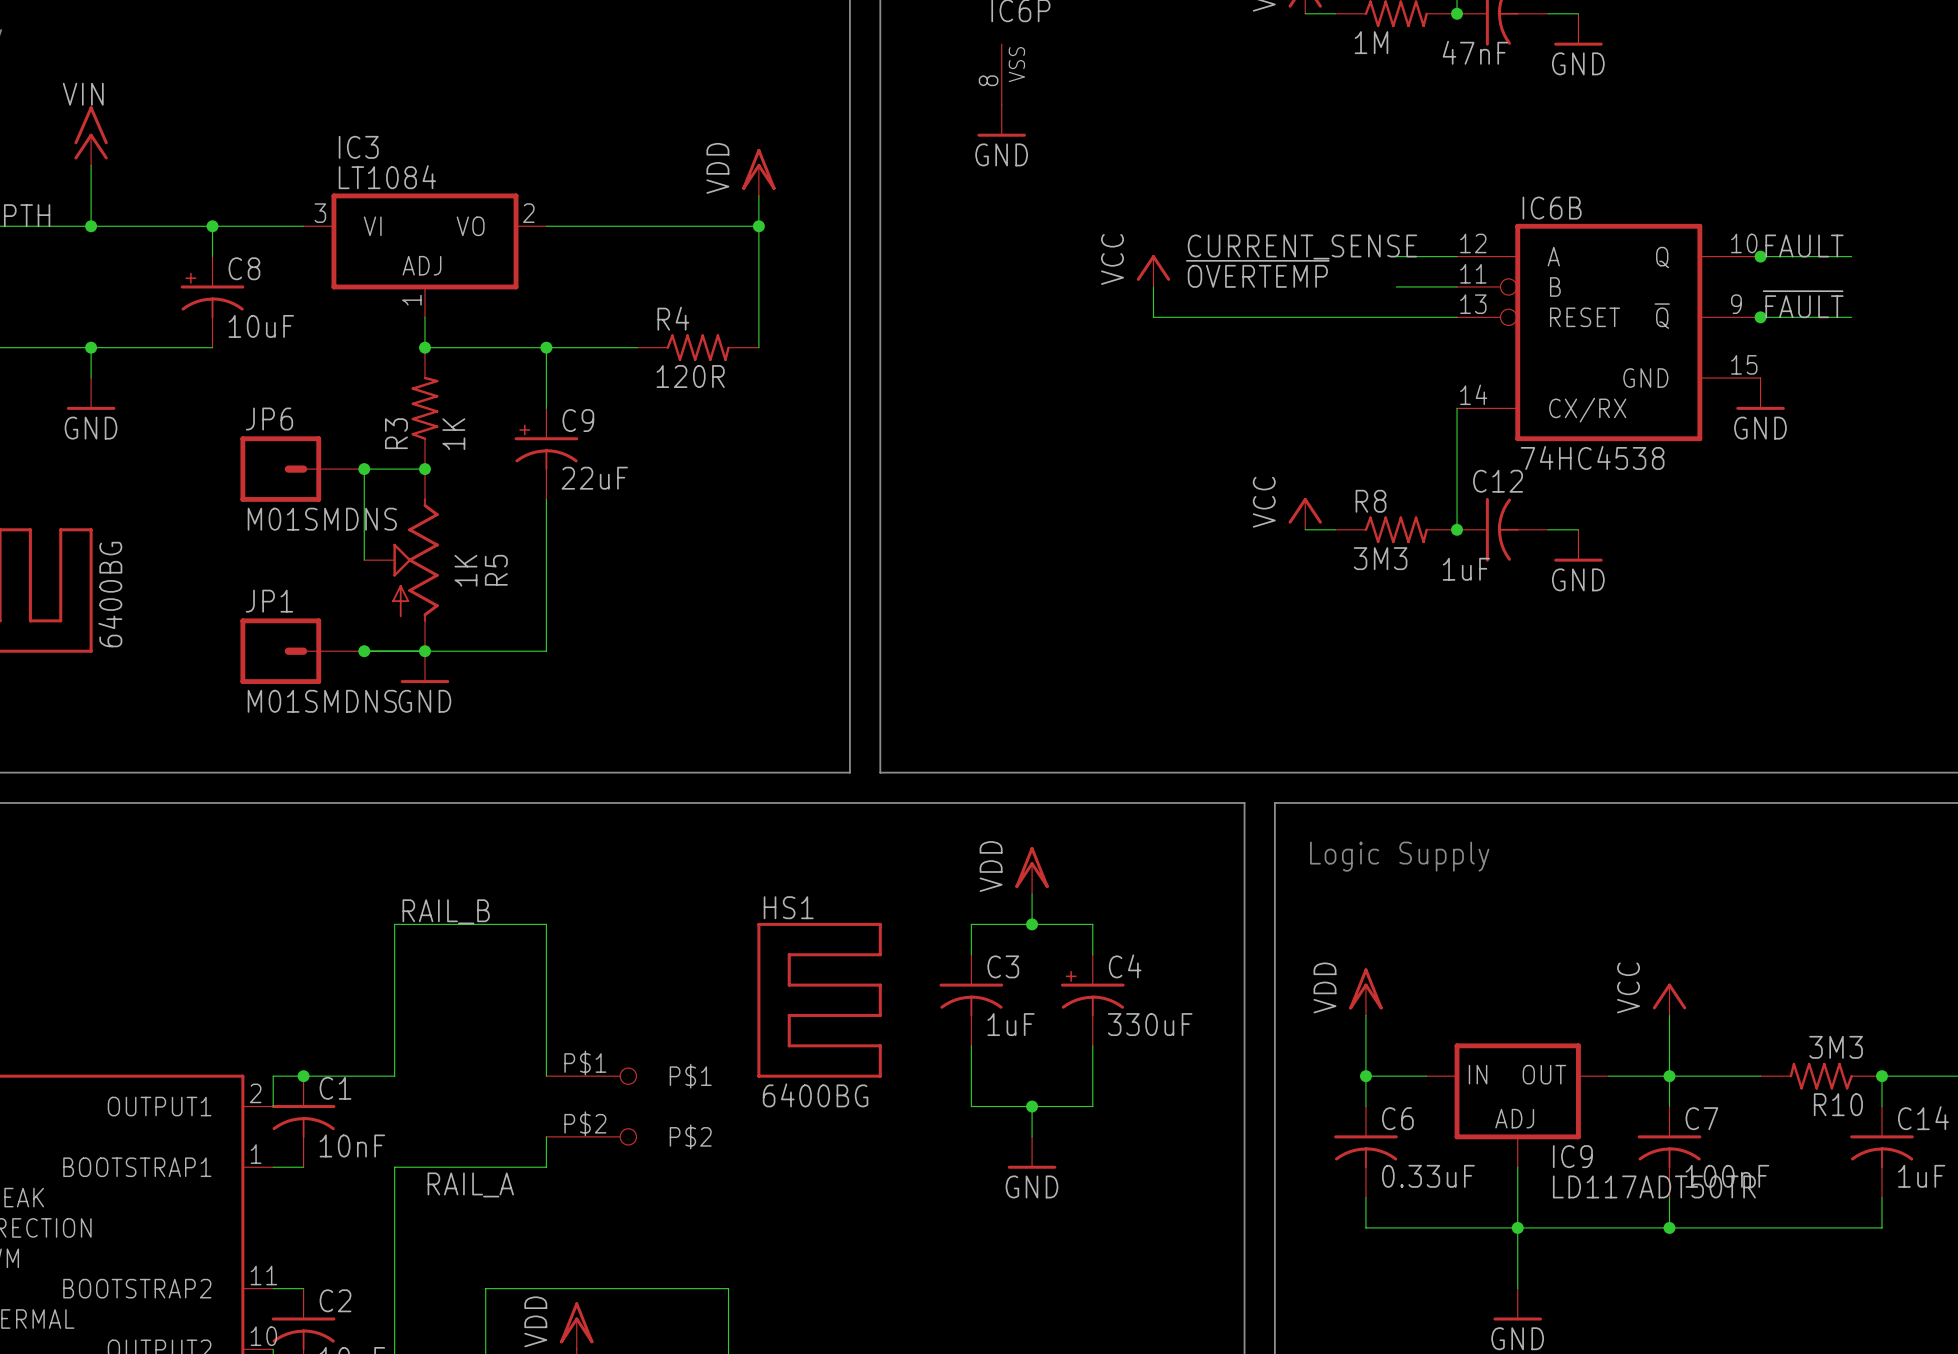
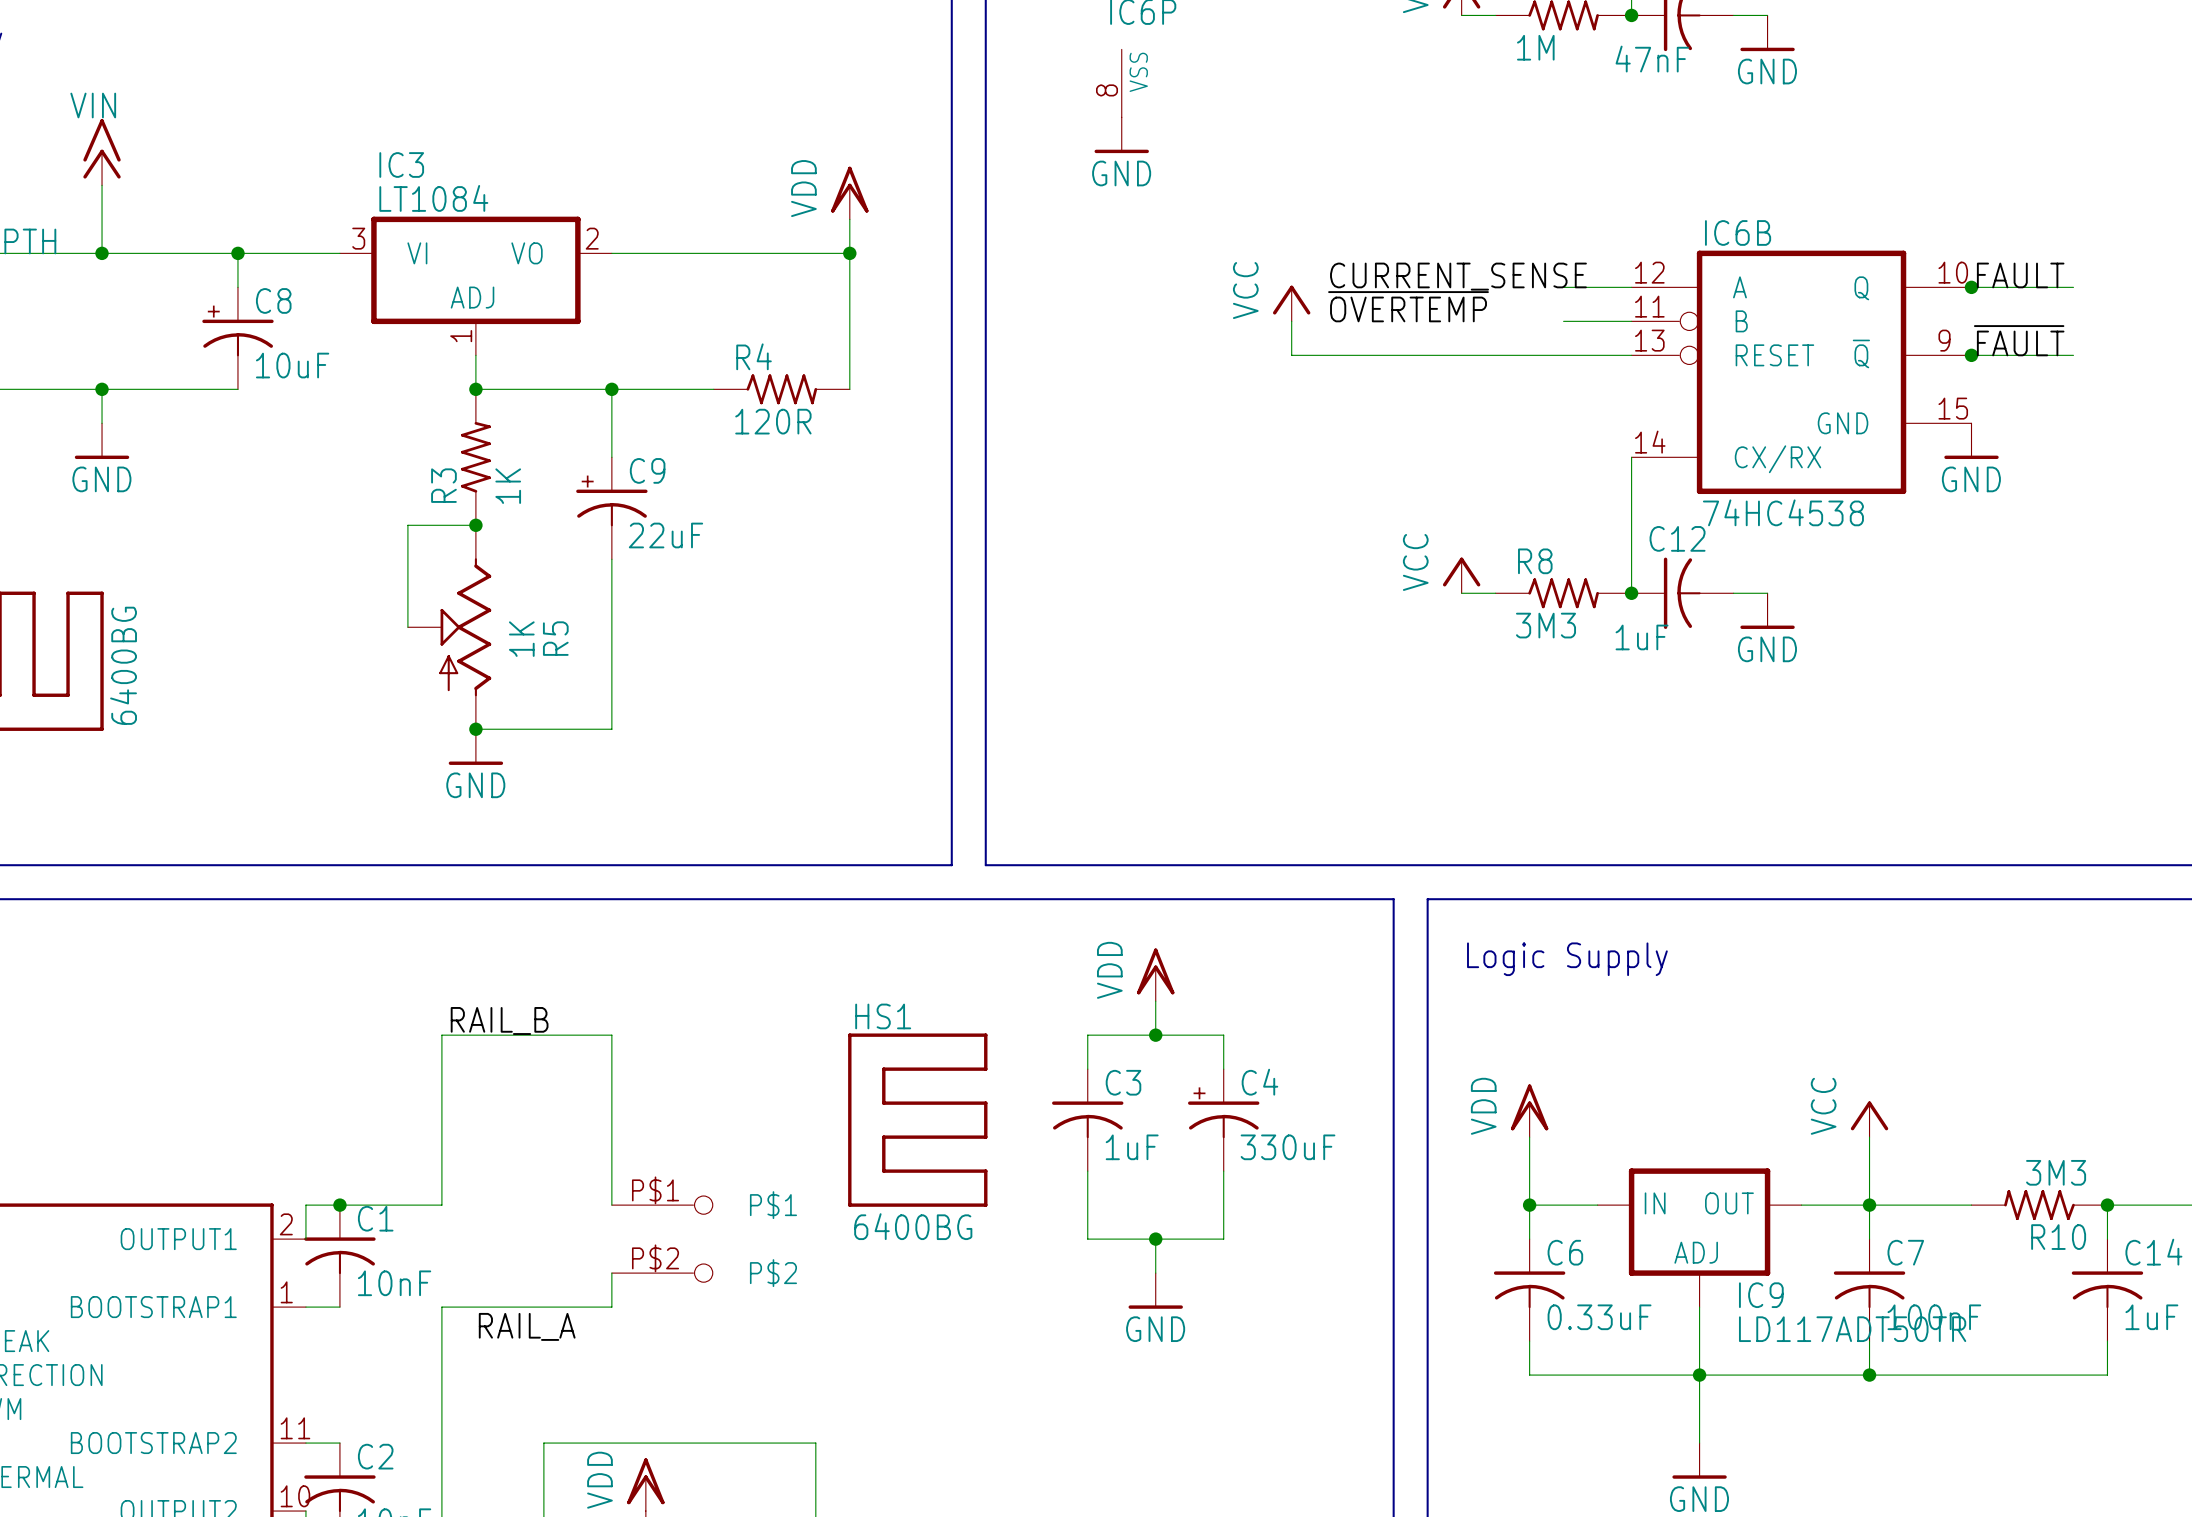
JP6: M01SMDNS (302, 469) -> none
junction: (364, 469) -> none
JP1: M01SMDNS (302, 651) -> none
wire: (364, 651) (424, 651) -> none
junction: (364, 651) -> none

